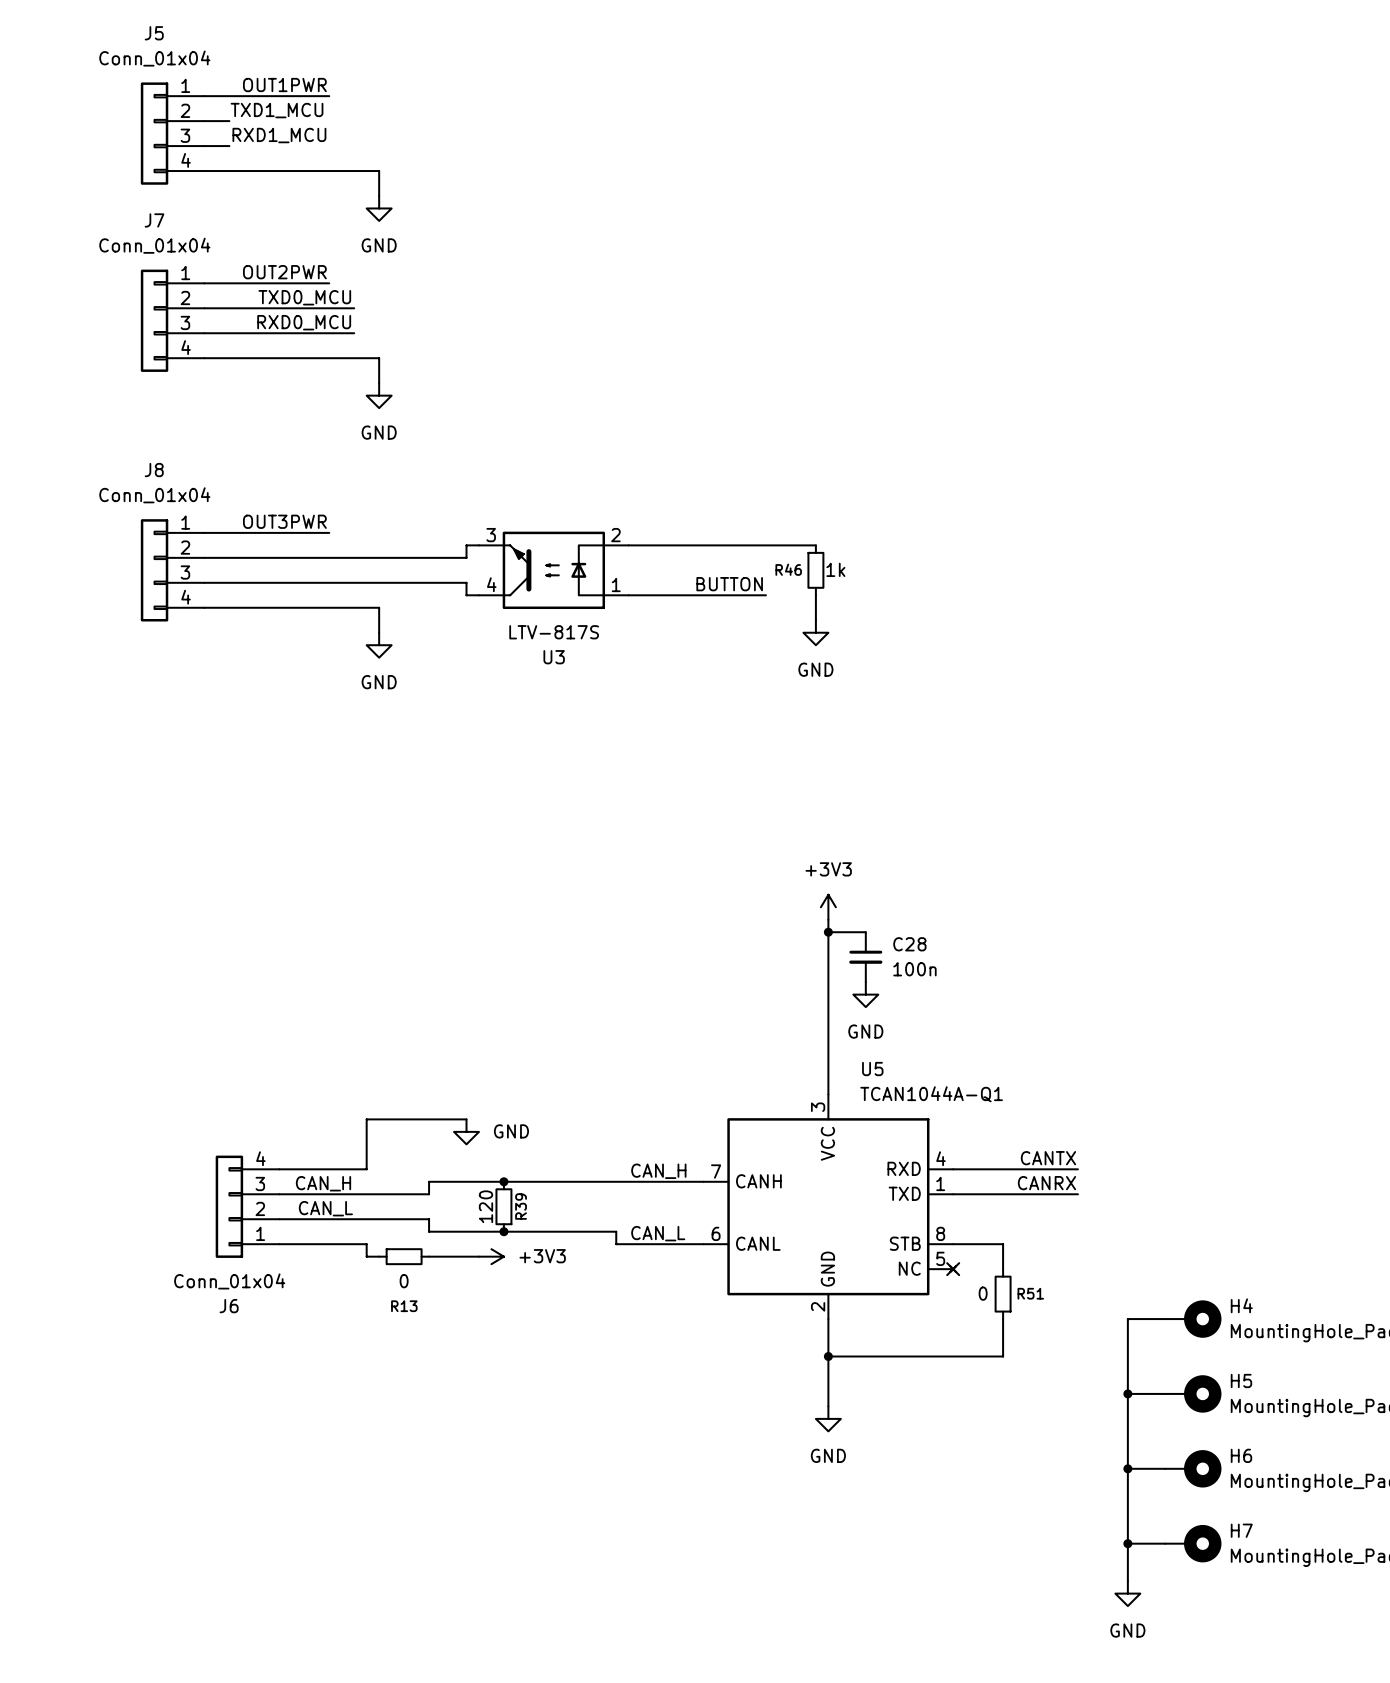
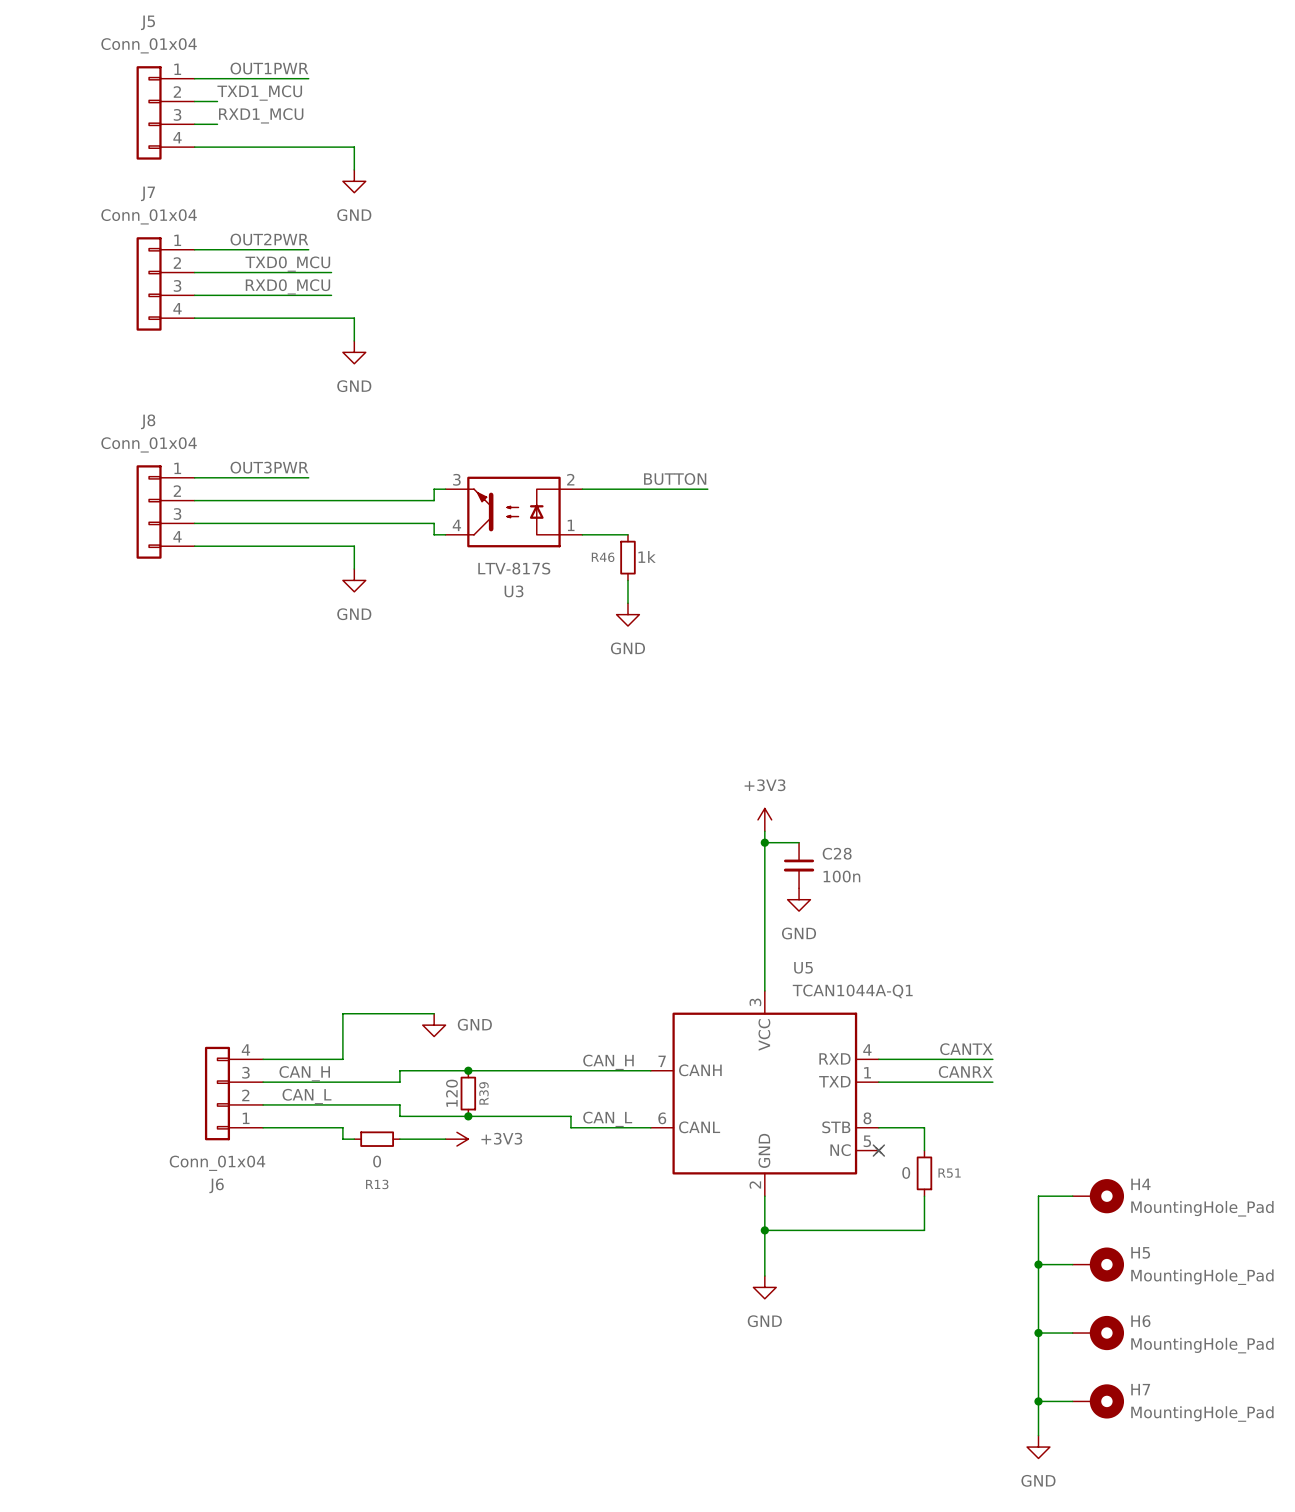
wire: (765, 545) (815, 545) -> none
R46 position: (815, 570) -> (627, 557)
label position: BUTTON (729, 584) -> BUTTON (675, 479)
wire: (678, 595) (765, 595) -> none
wire: (815, 595) (815, 620) -> (627, 580) (627, 603)
power symbol position: GND (815, 632) -> GND (627, 614)

